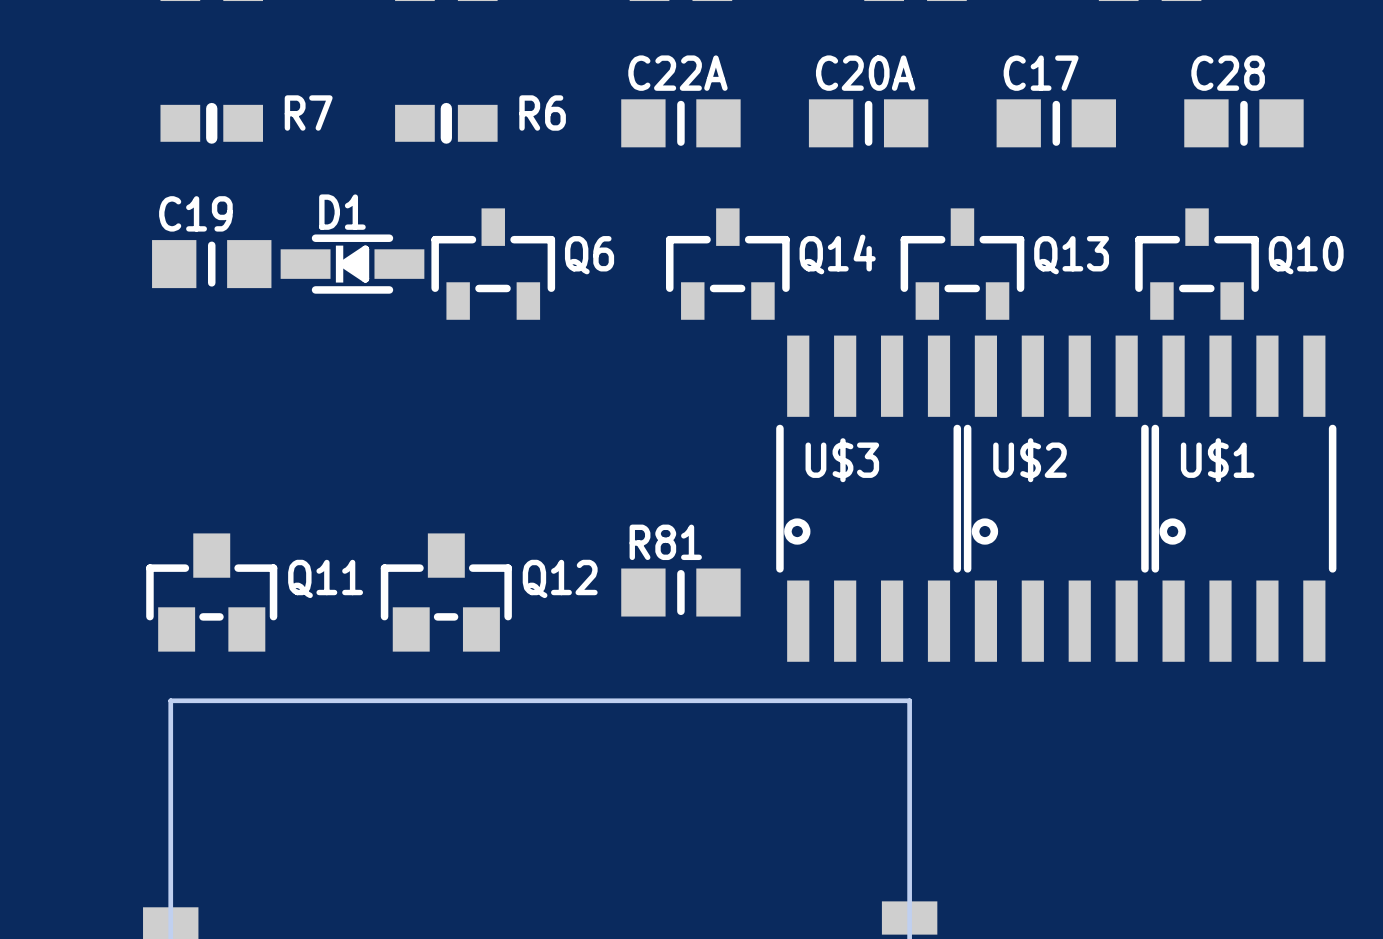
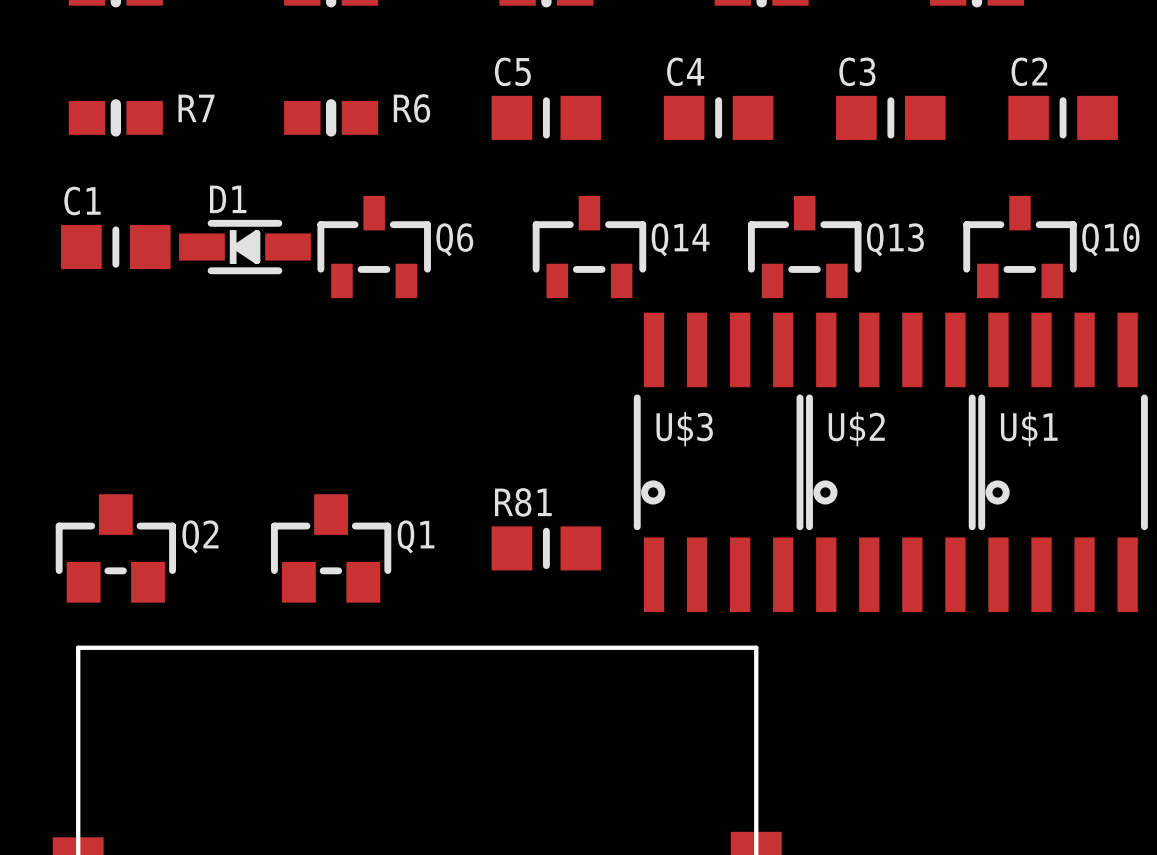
C22A name: C22A (677, 73) -> C5 (512, 71)
C20A name: C20A (865, 73) -> C4 (685, 71)
C17 name: C17 (1041, 73) -> C3 (857, 71)
C28 name: C28 (1228, 73) -> C2 (1029, 71)
C19 name: C19 (195, 213) -> C1 (82, 201)
Q11 name: Q11 (325, 578) -> Q2 (200, 536)
Q12 name: Q12 (560, 578) -> Q1 (416, 536)

